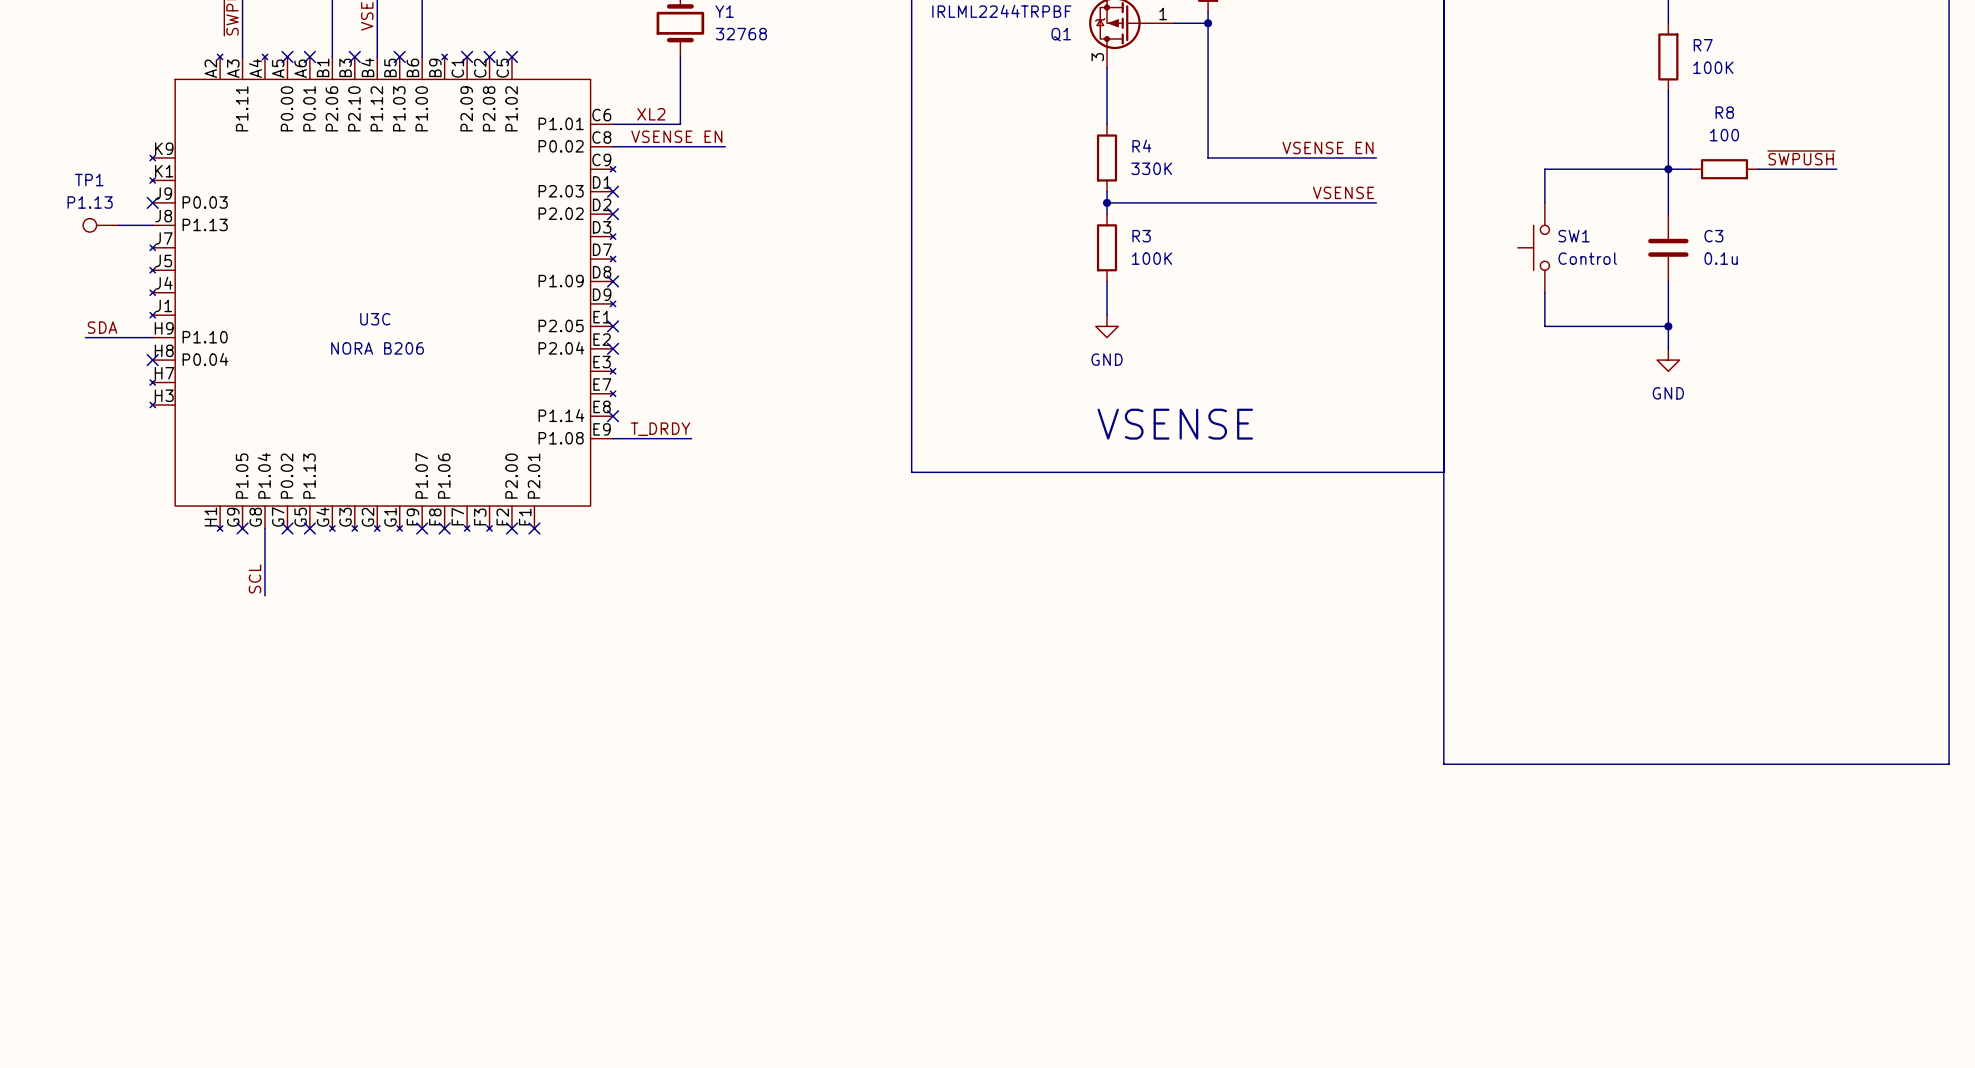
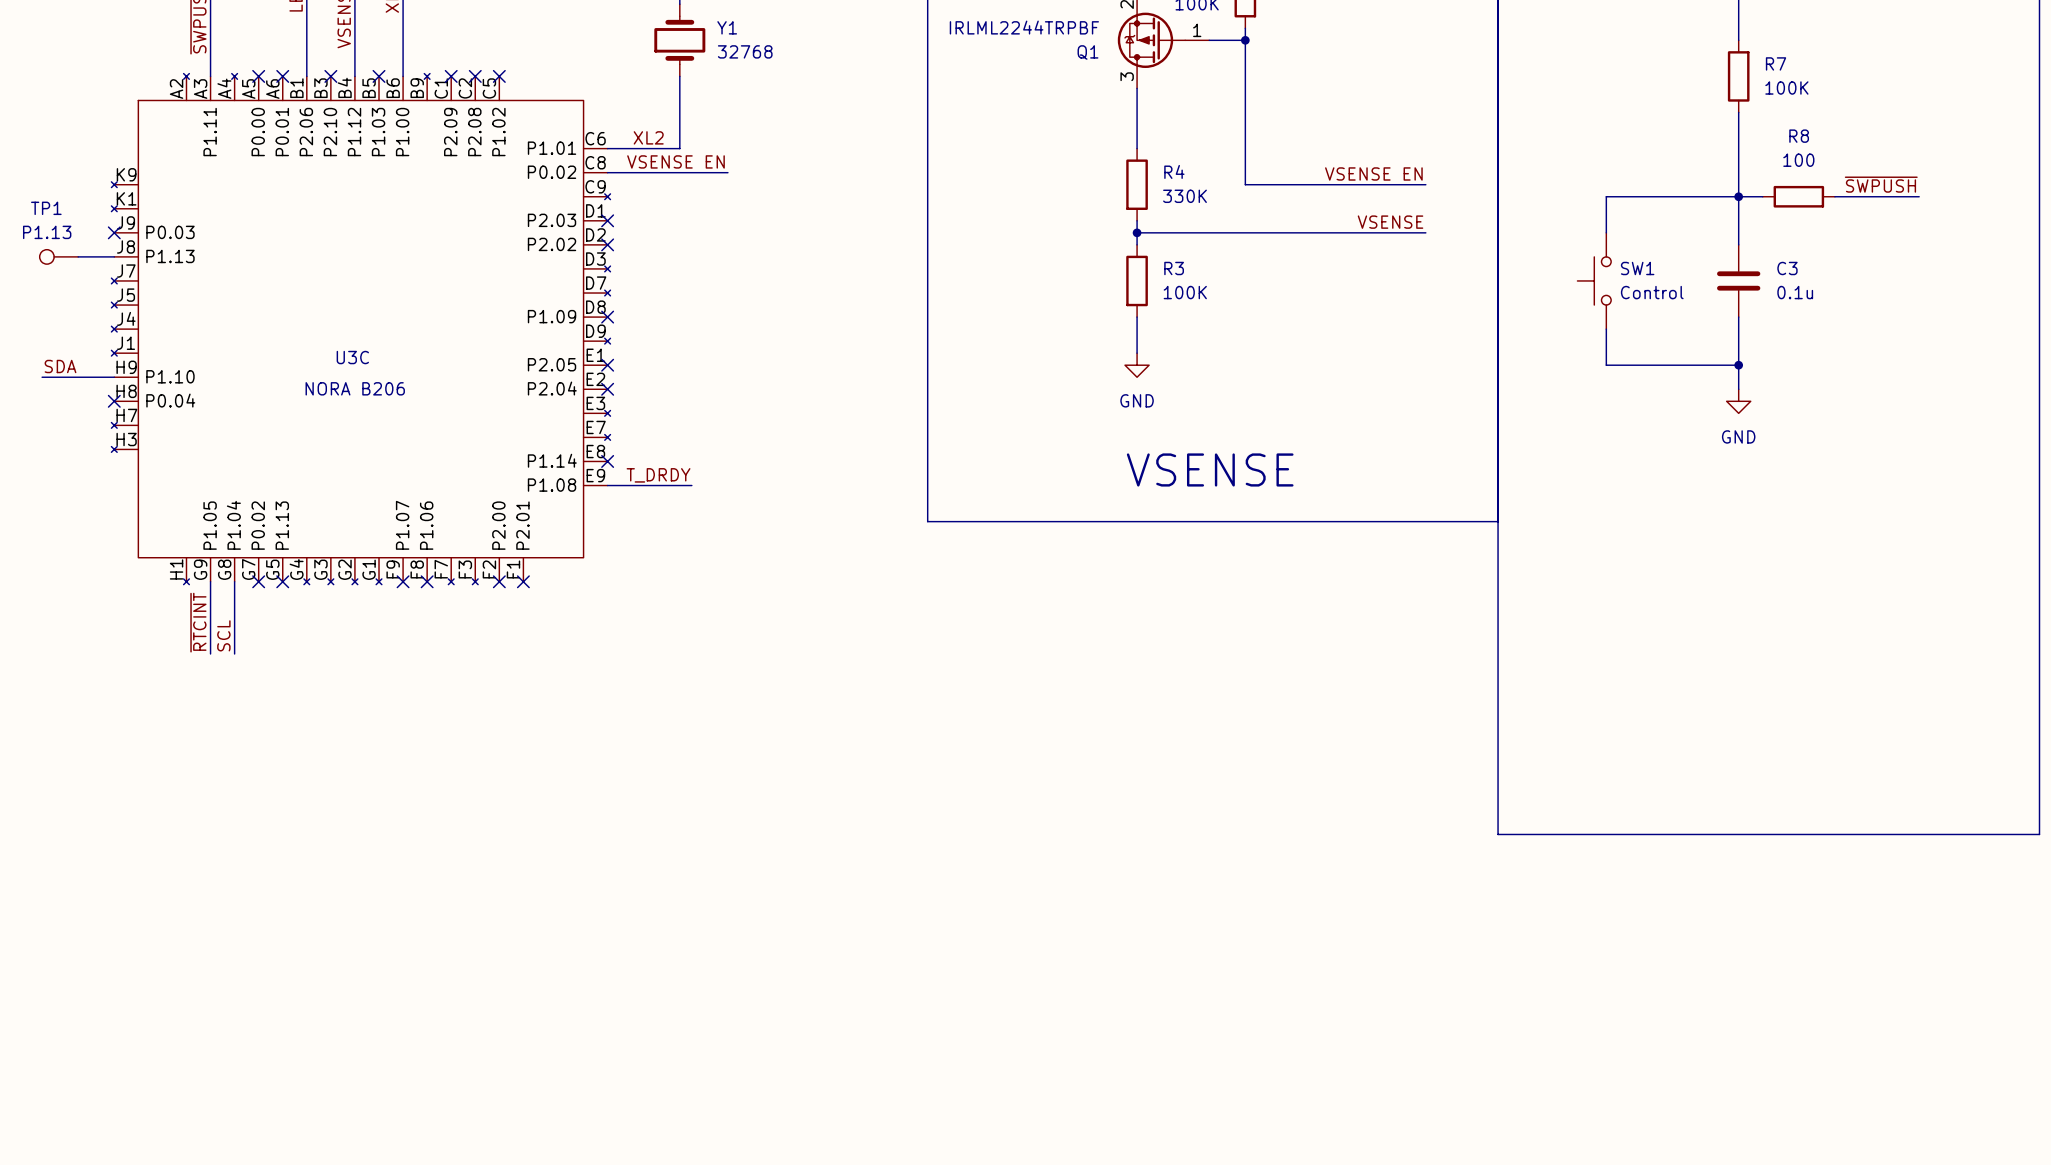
wire: none -> (210, 581) (210, 653)
no-connect mark: (242, 528) -> none
label: none -> ~{RTCINT} (198, 622)

